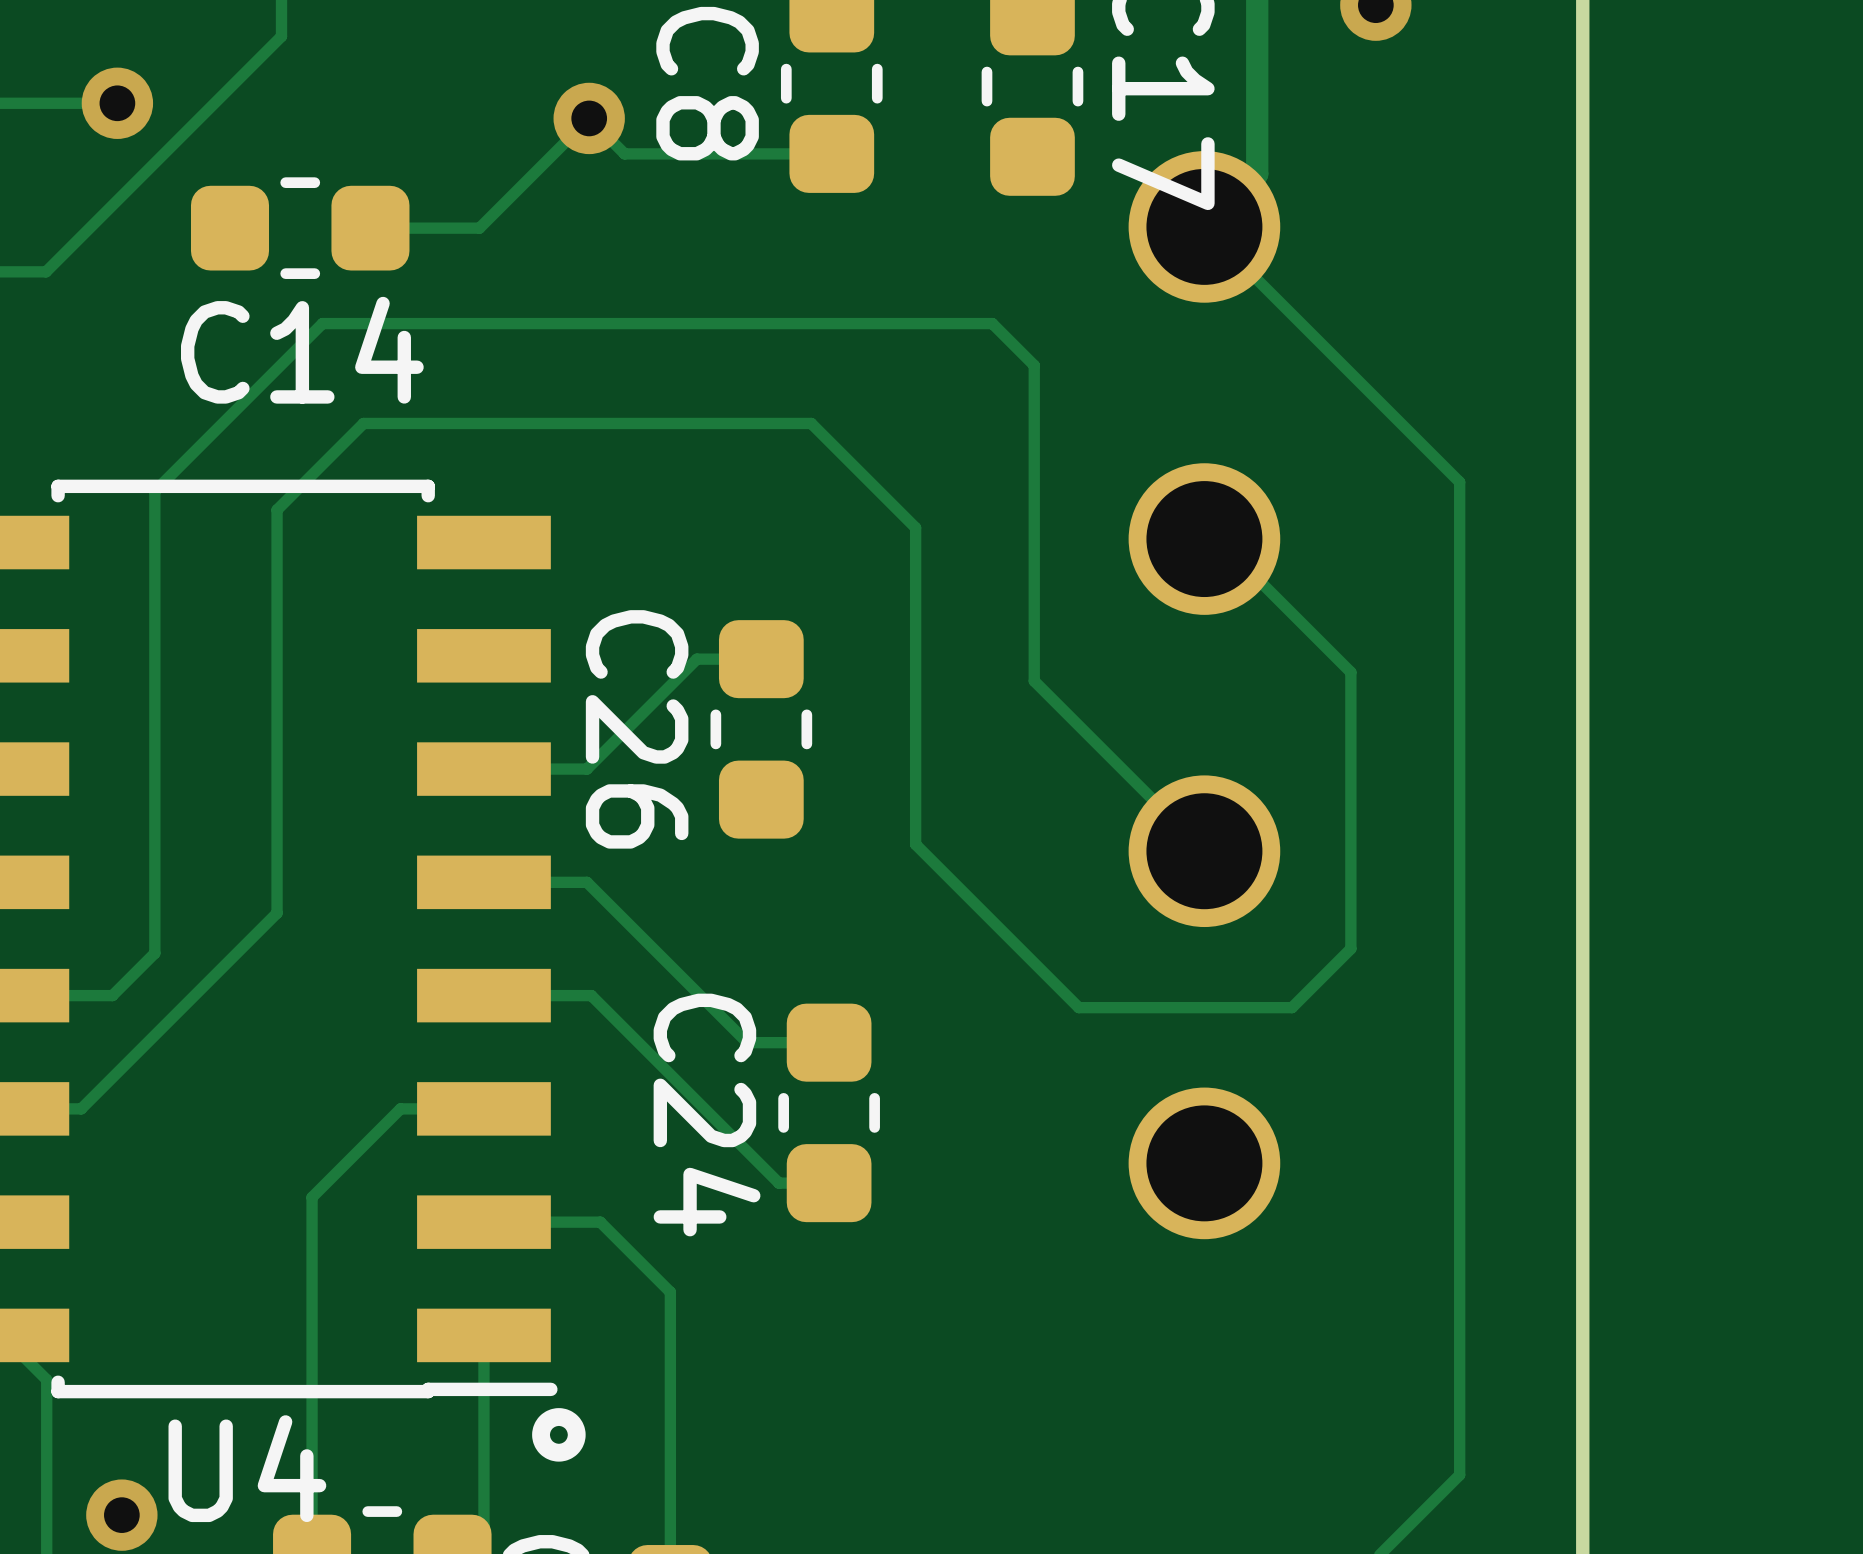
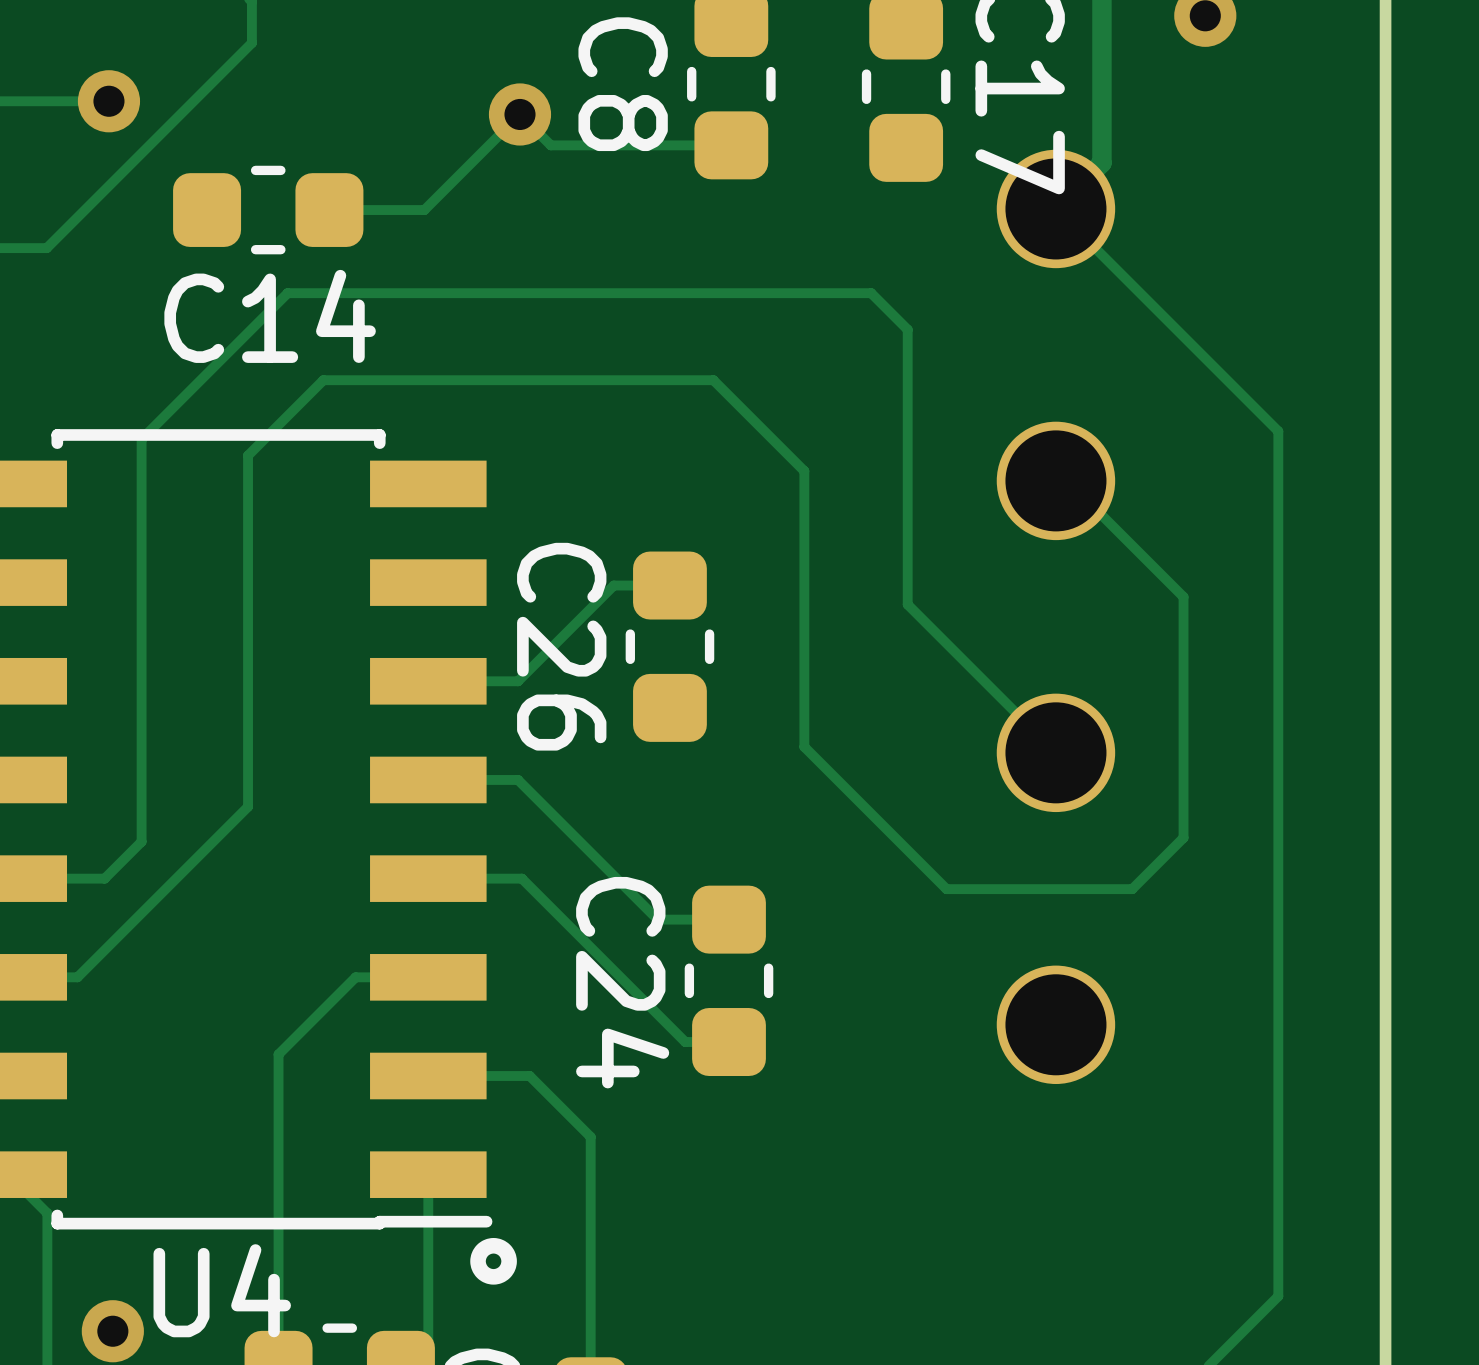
part footprint: [1128, 151, 1281, 1240] -> [996, 149, 1116, 1085]

